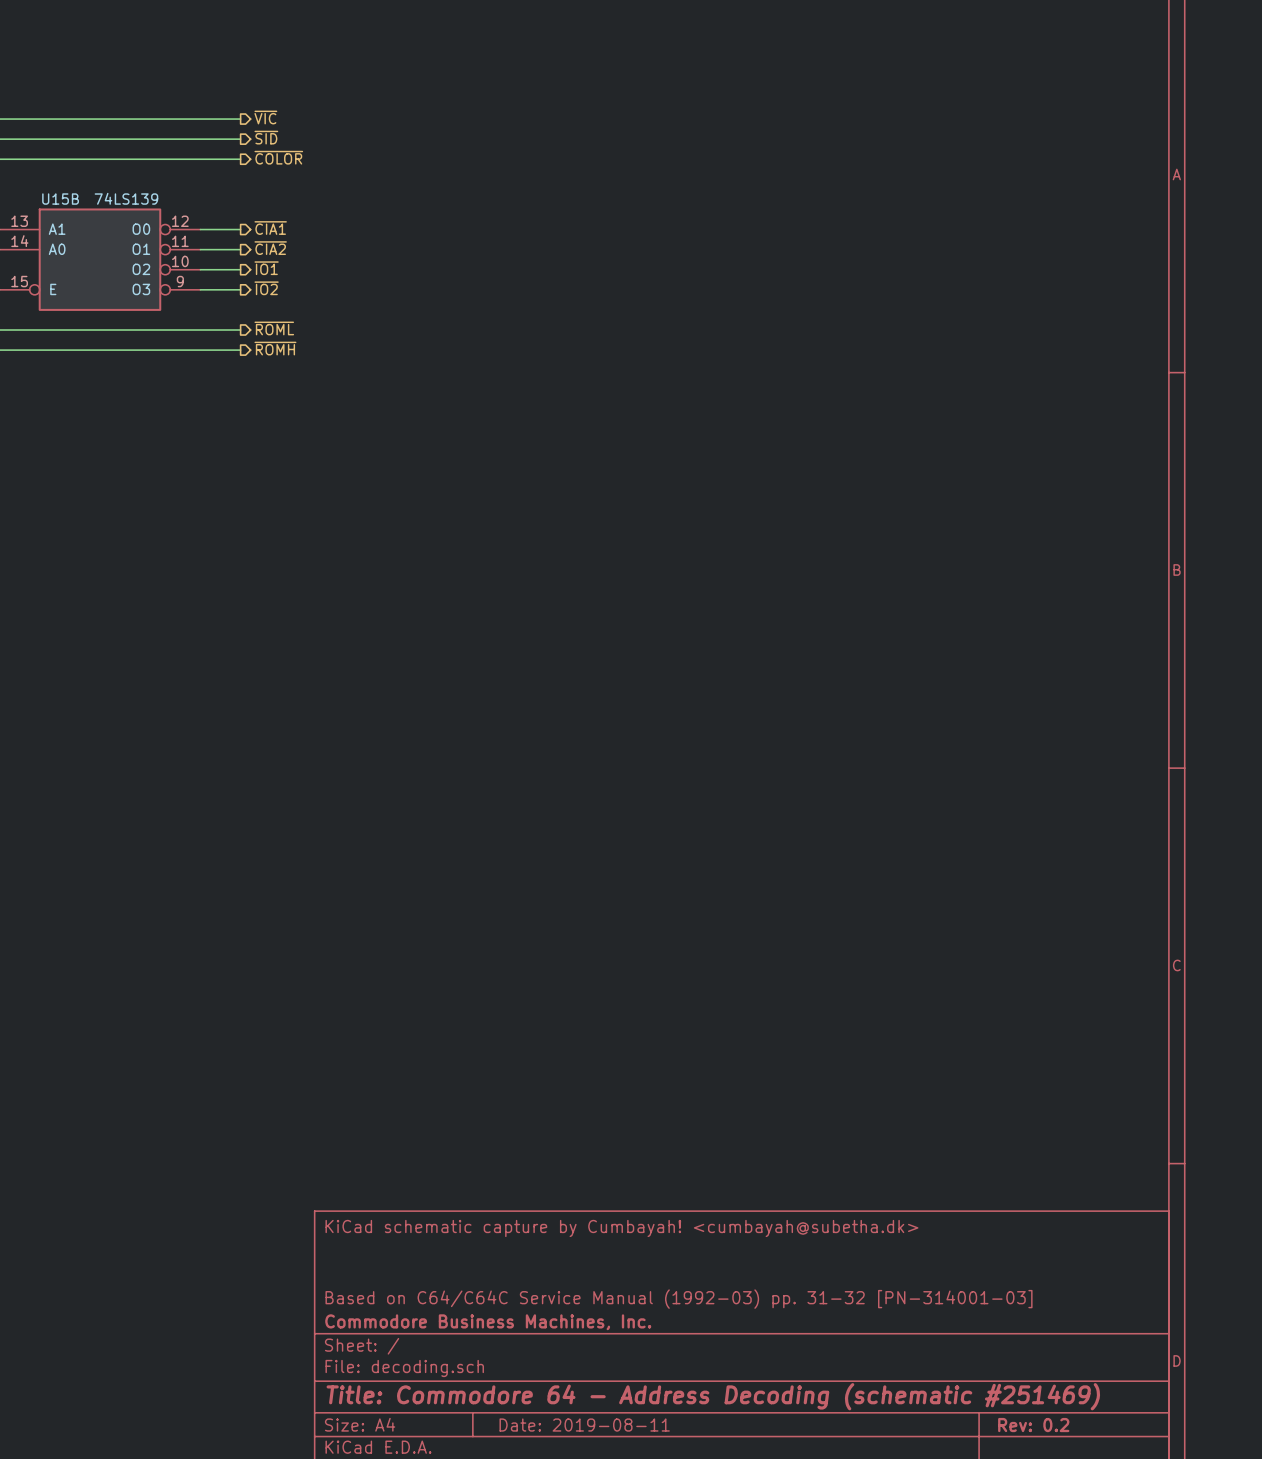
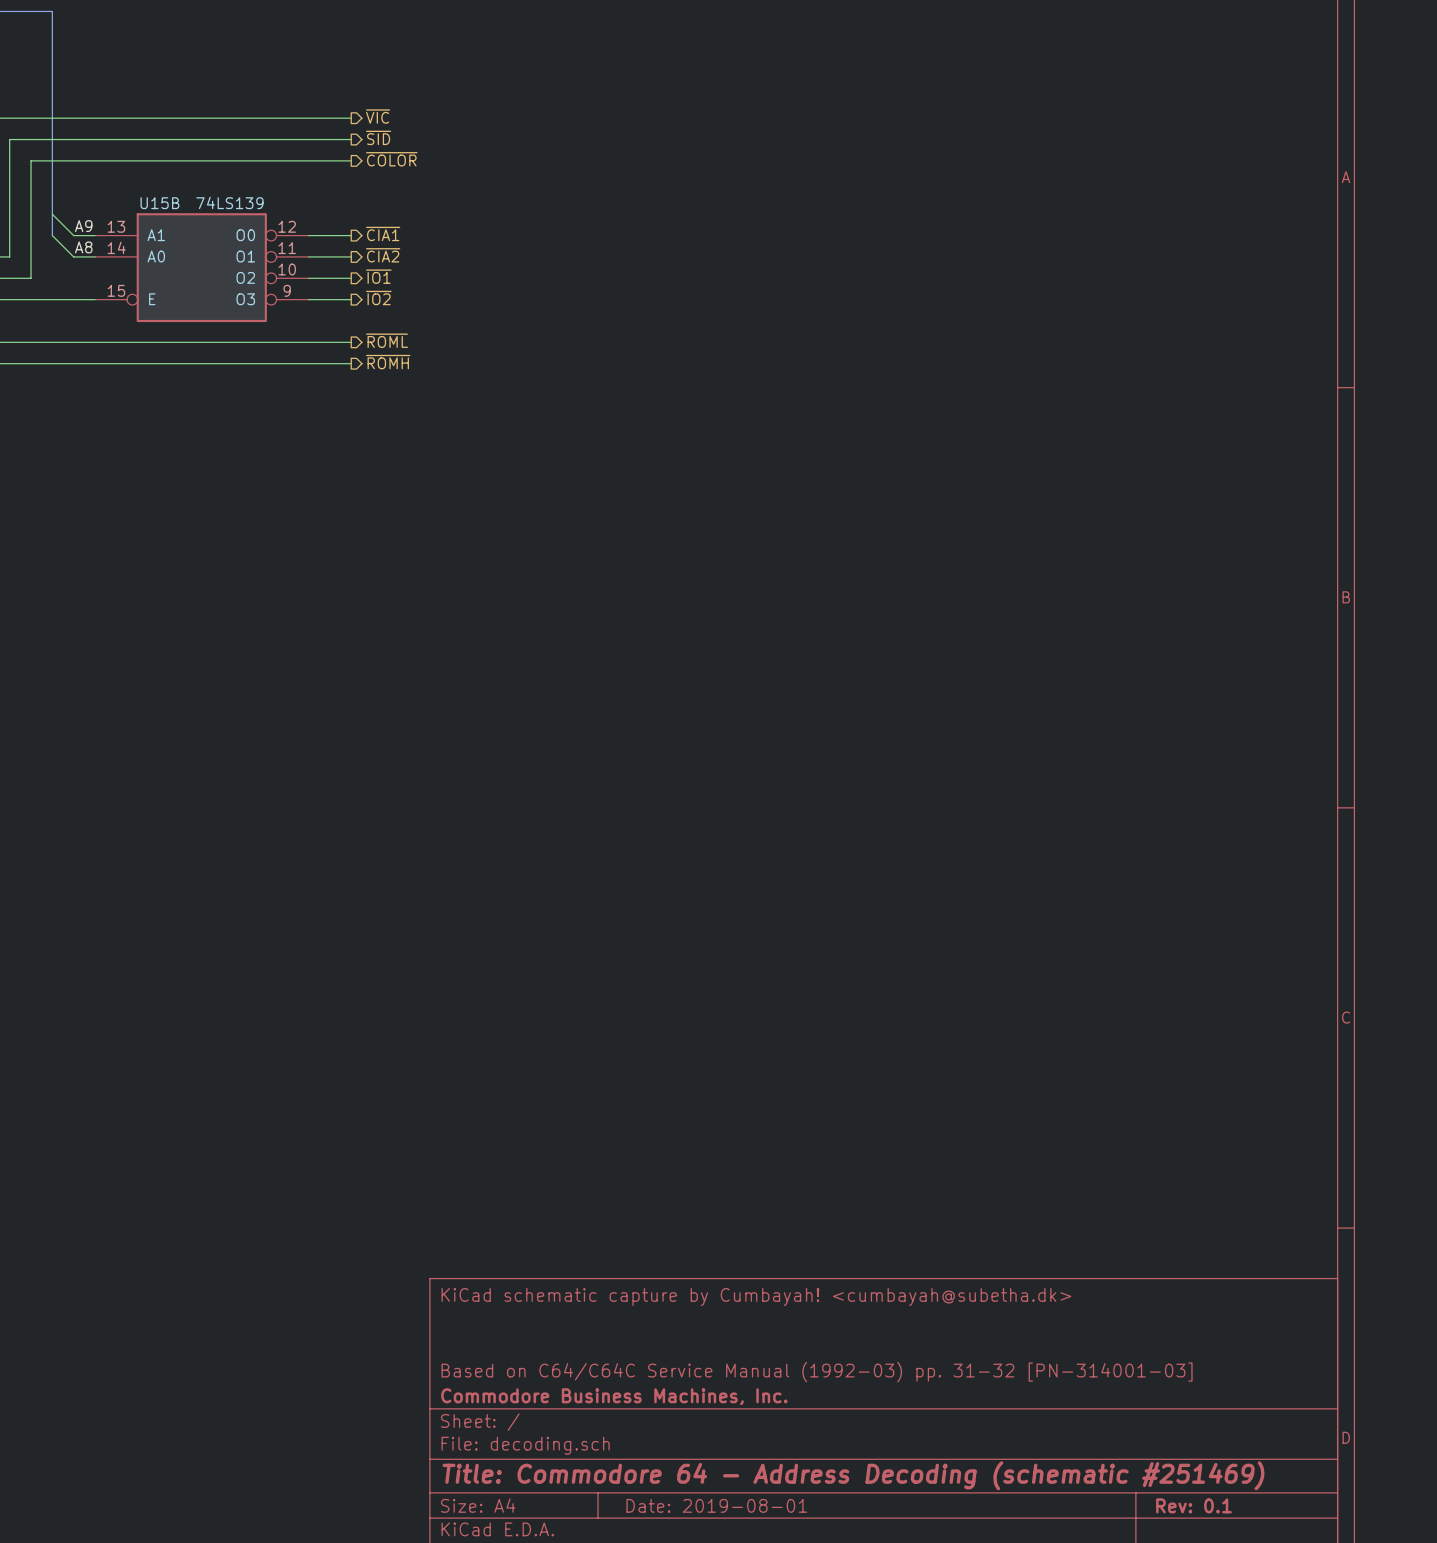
title block: Date: 2019-08-11 (584, 1425) -> Date: 2019-08-01 (716, 1505)
title block: Rev: 0.2 (1033, 1425) -> Rev: 0.1 (1193, 1505)

